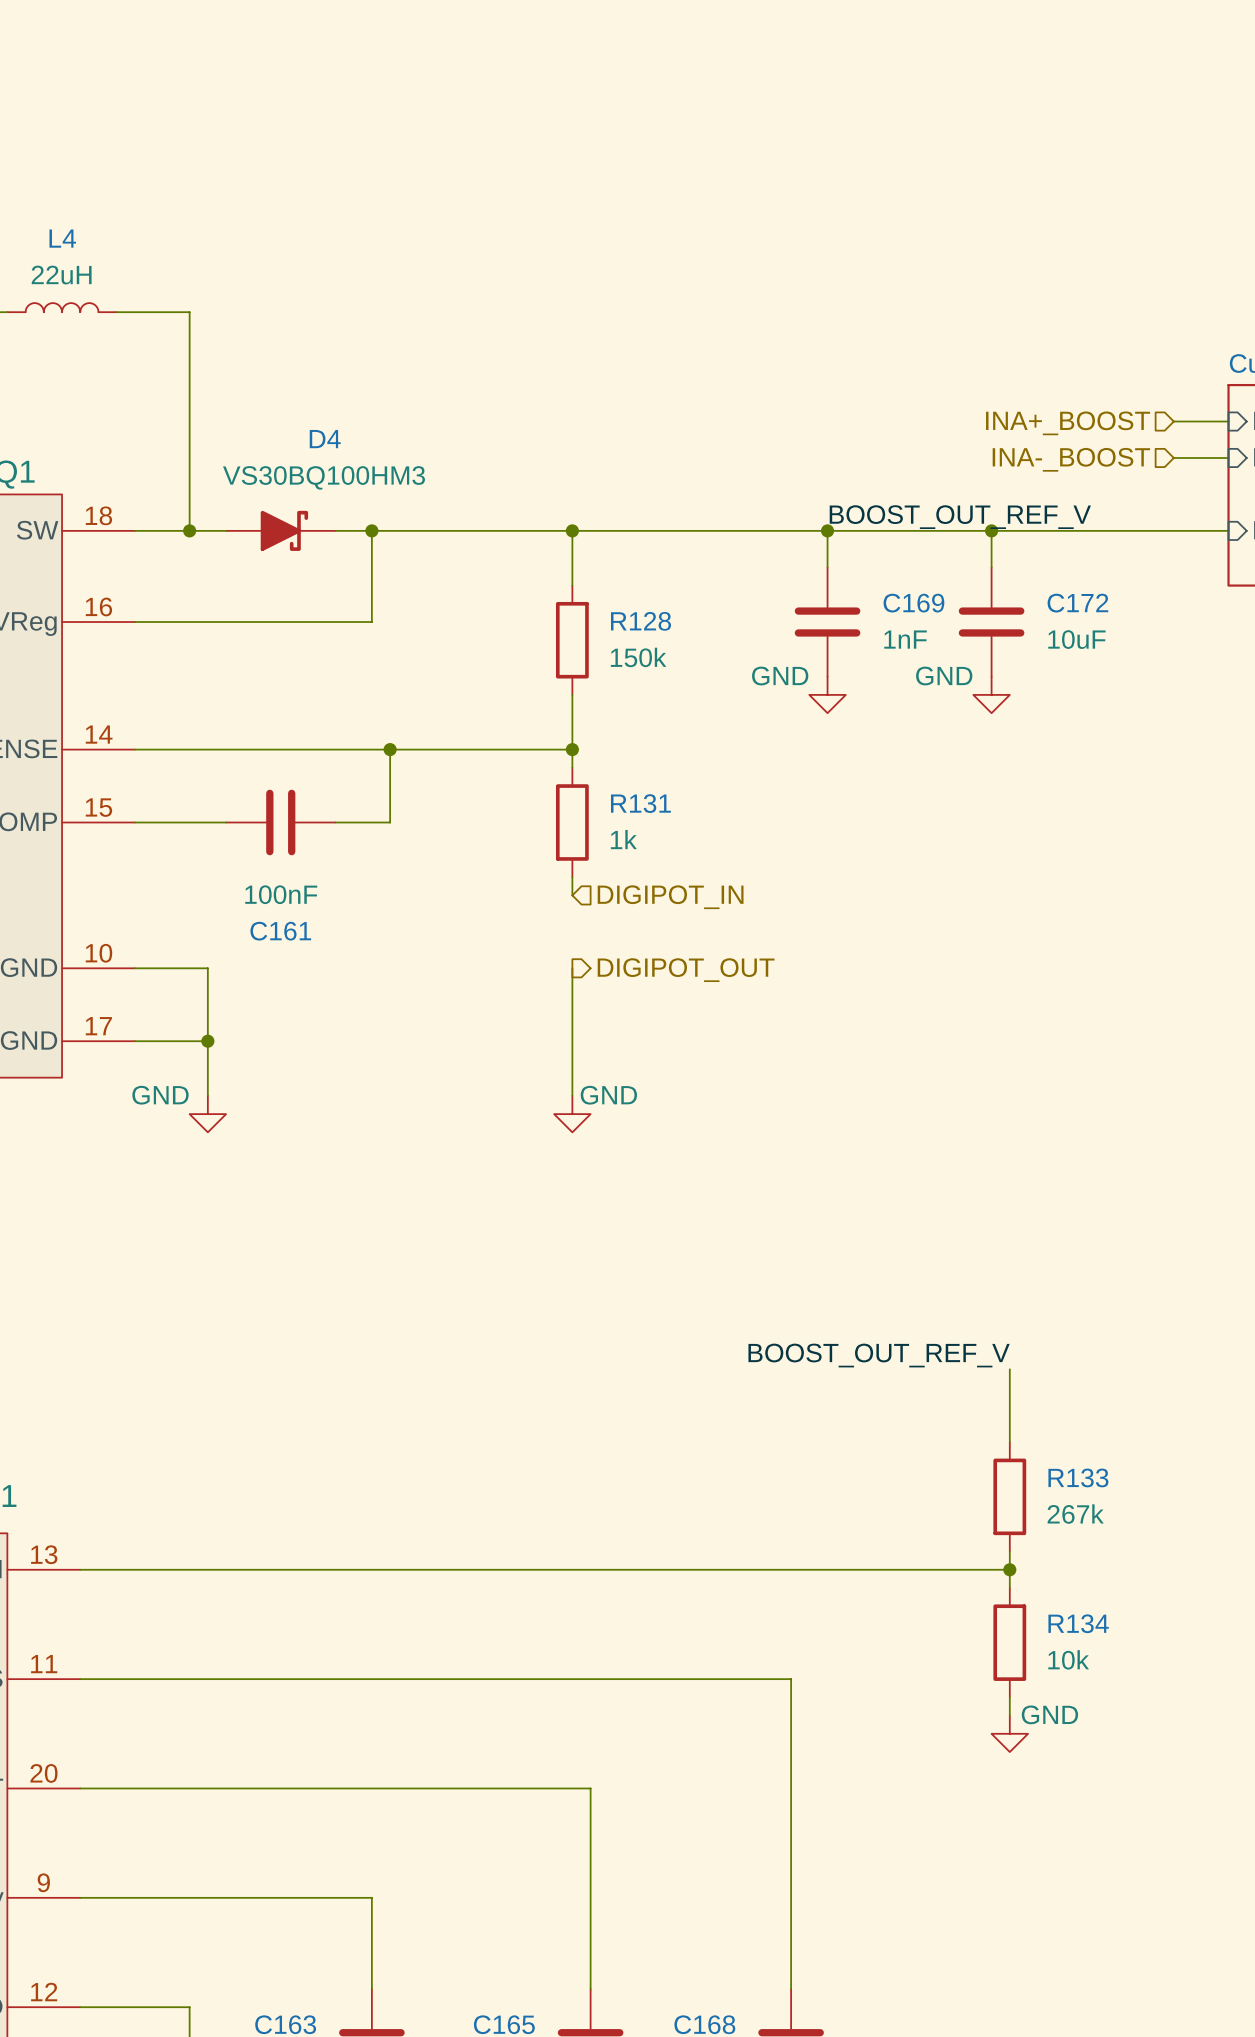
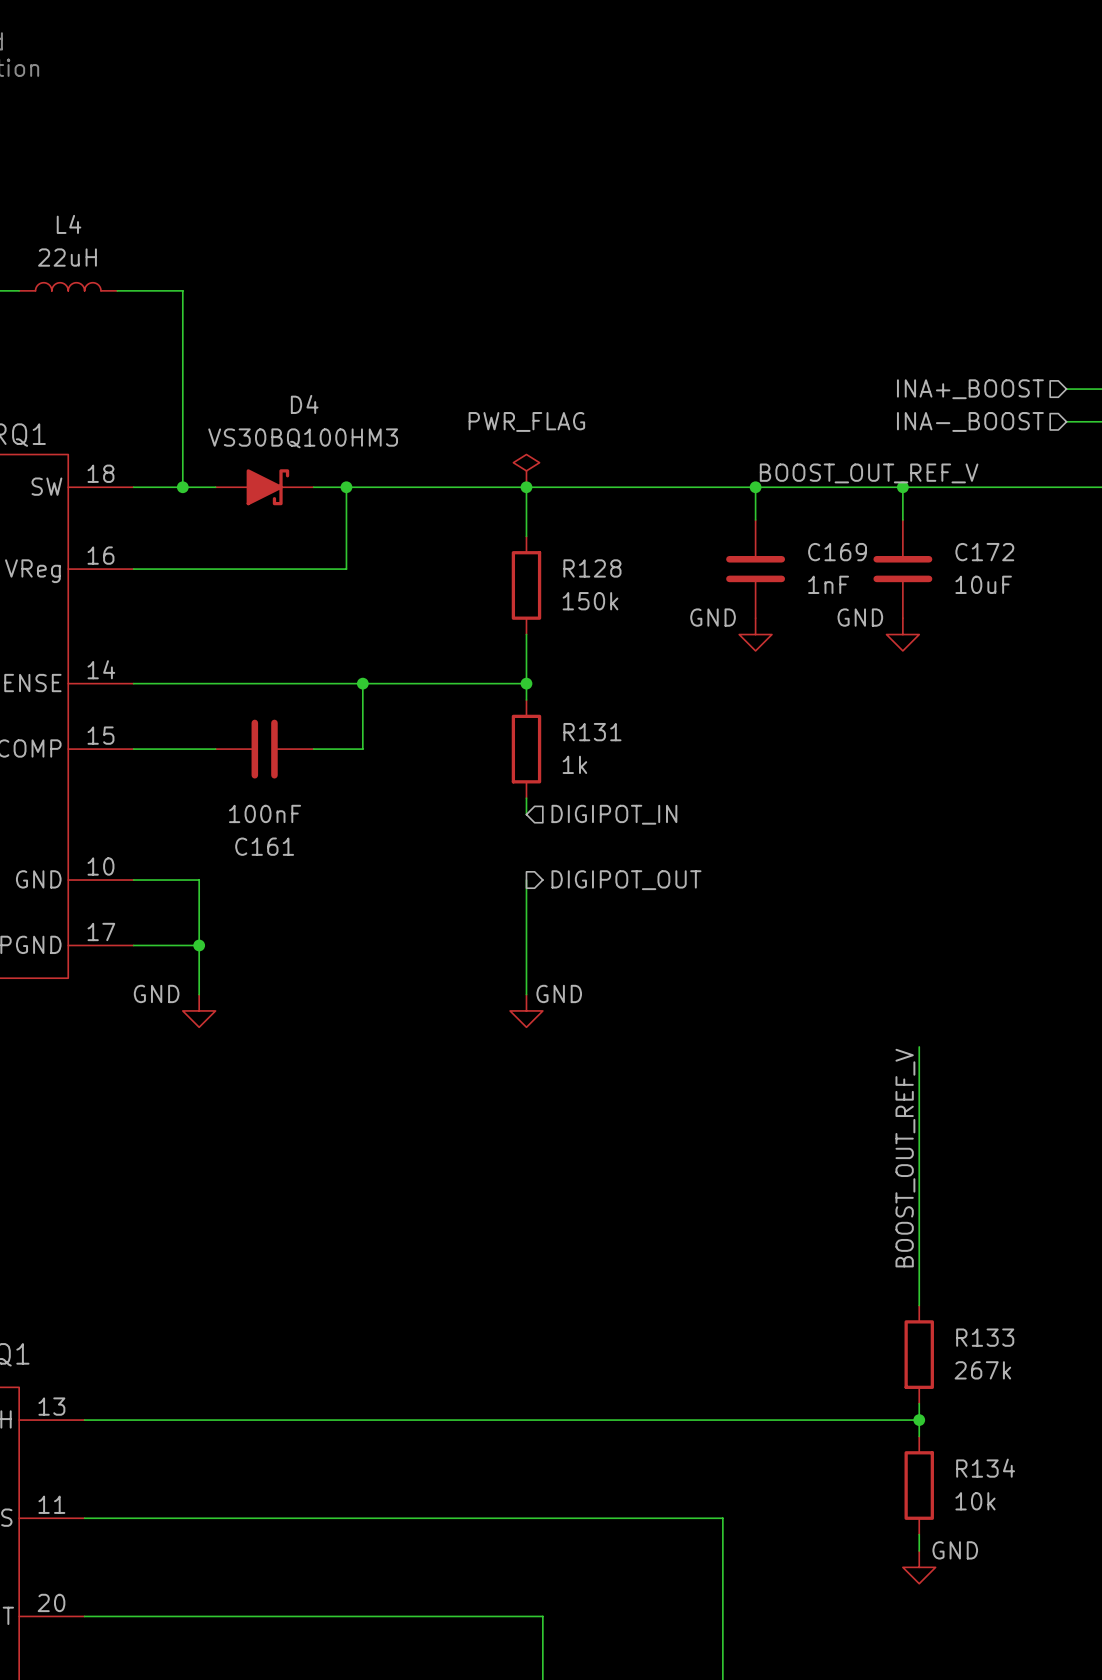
power symbol: none -> PWR_FLAG (526, 470)
wire: none -> (919, 1046) (919, 1240)
label rotation: 0° (879, 1355) -> 90° counterclockwise (905, 1158)

